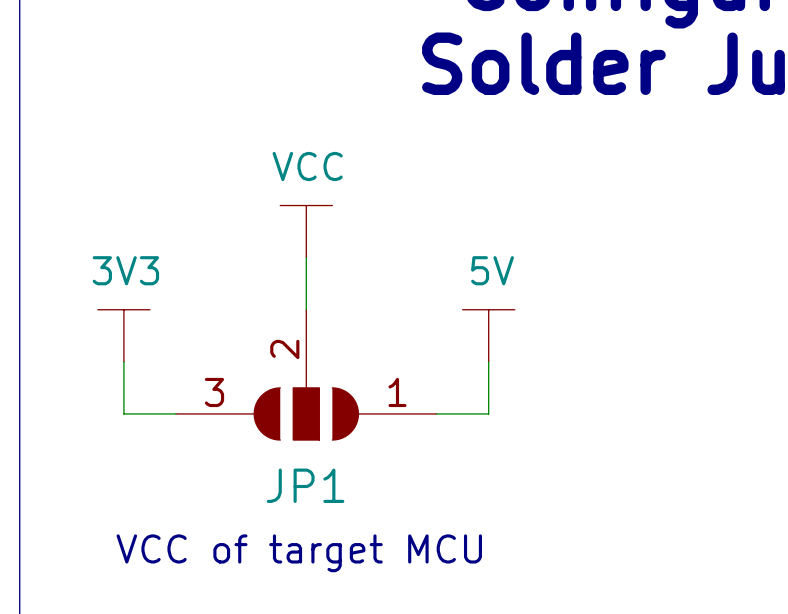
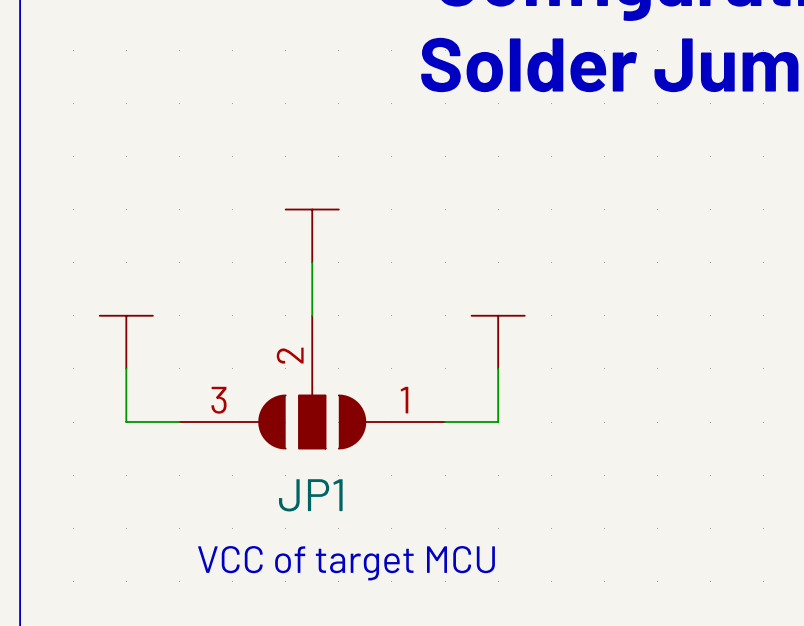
power symbol text: VCC (307, 166) -> none
power symbol text: 3V3 (125, 270) -> none
power symbol text: 5V (492, 270) -> none

